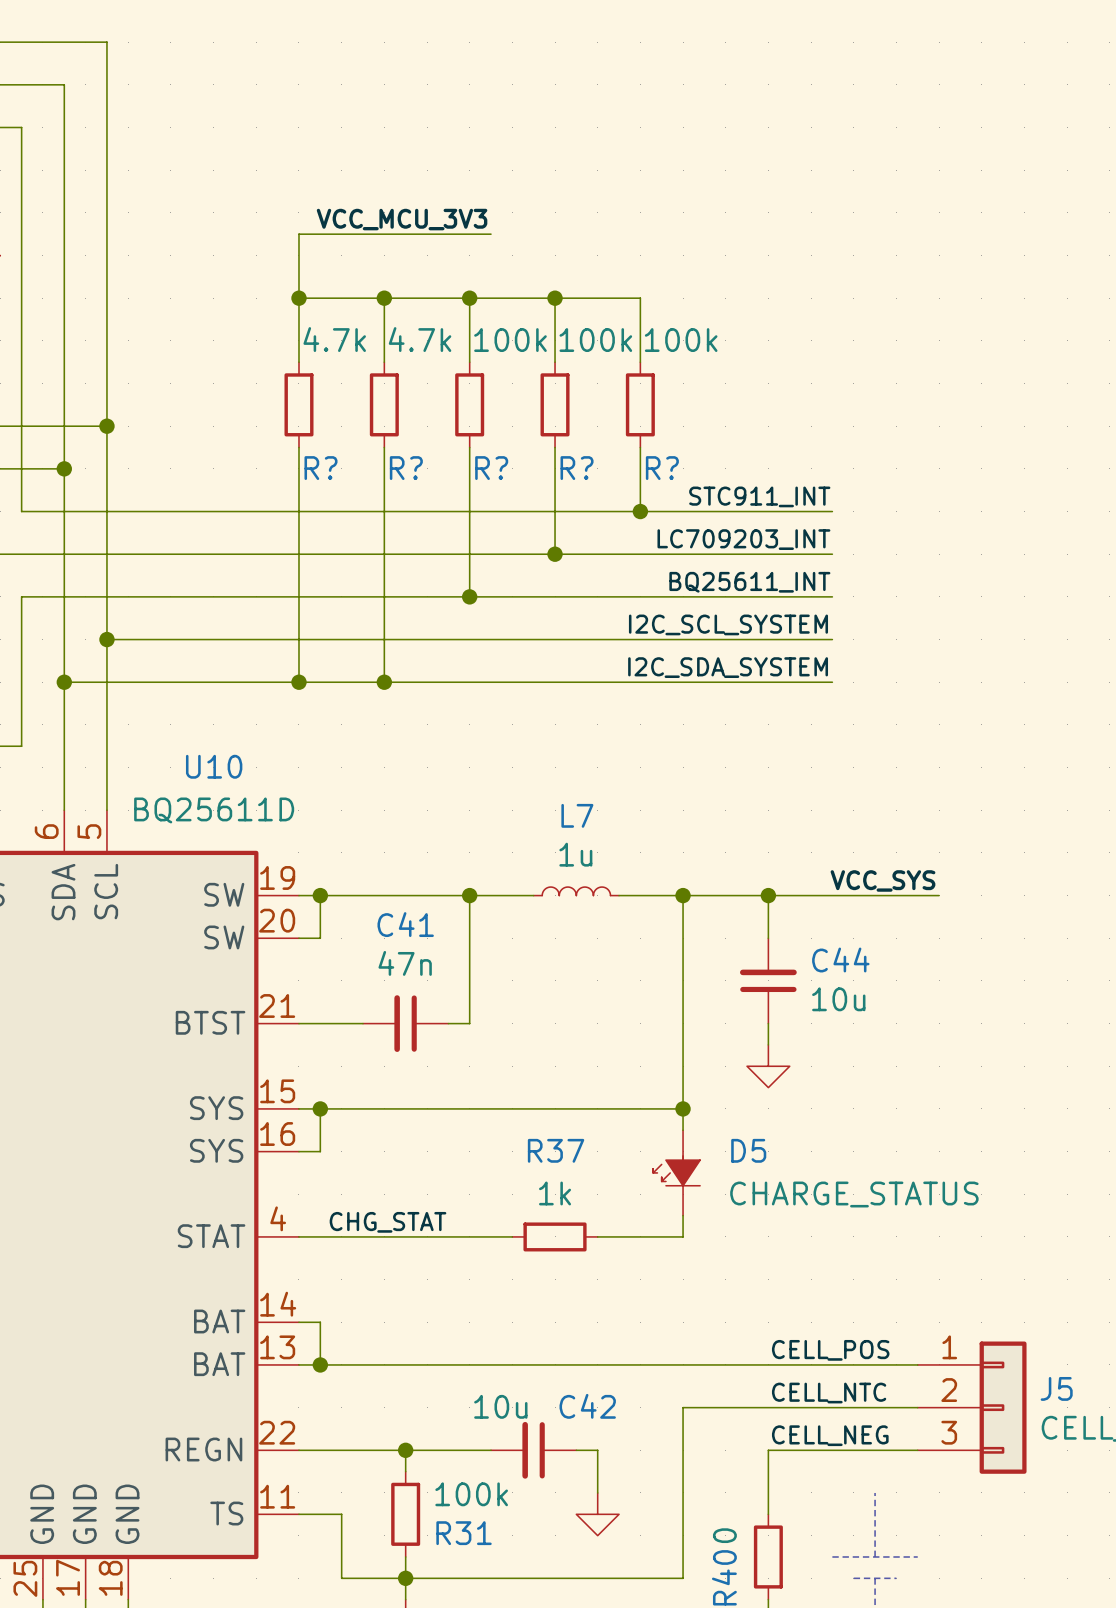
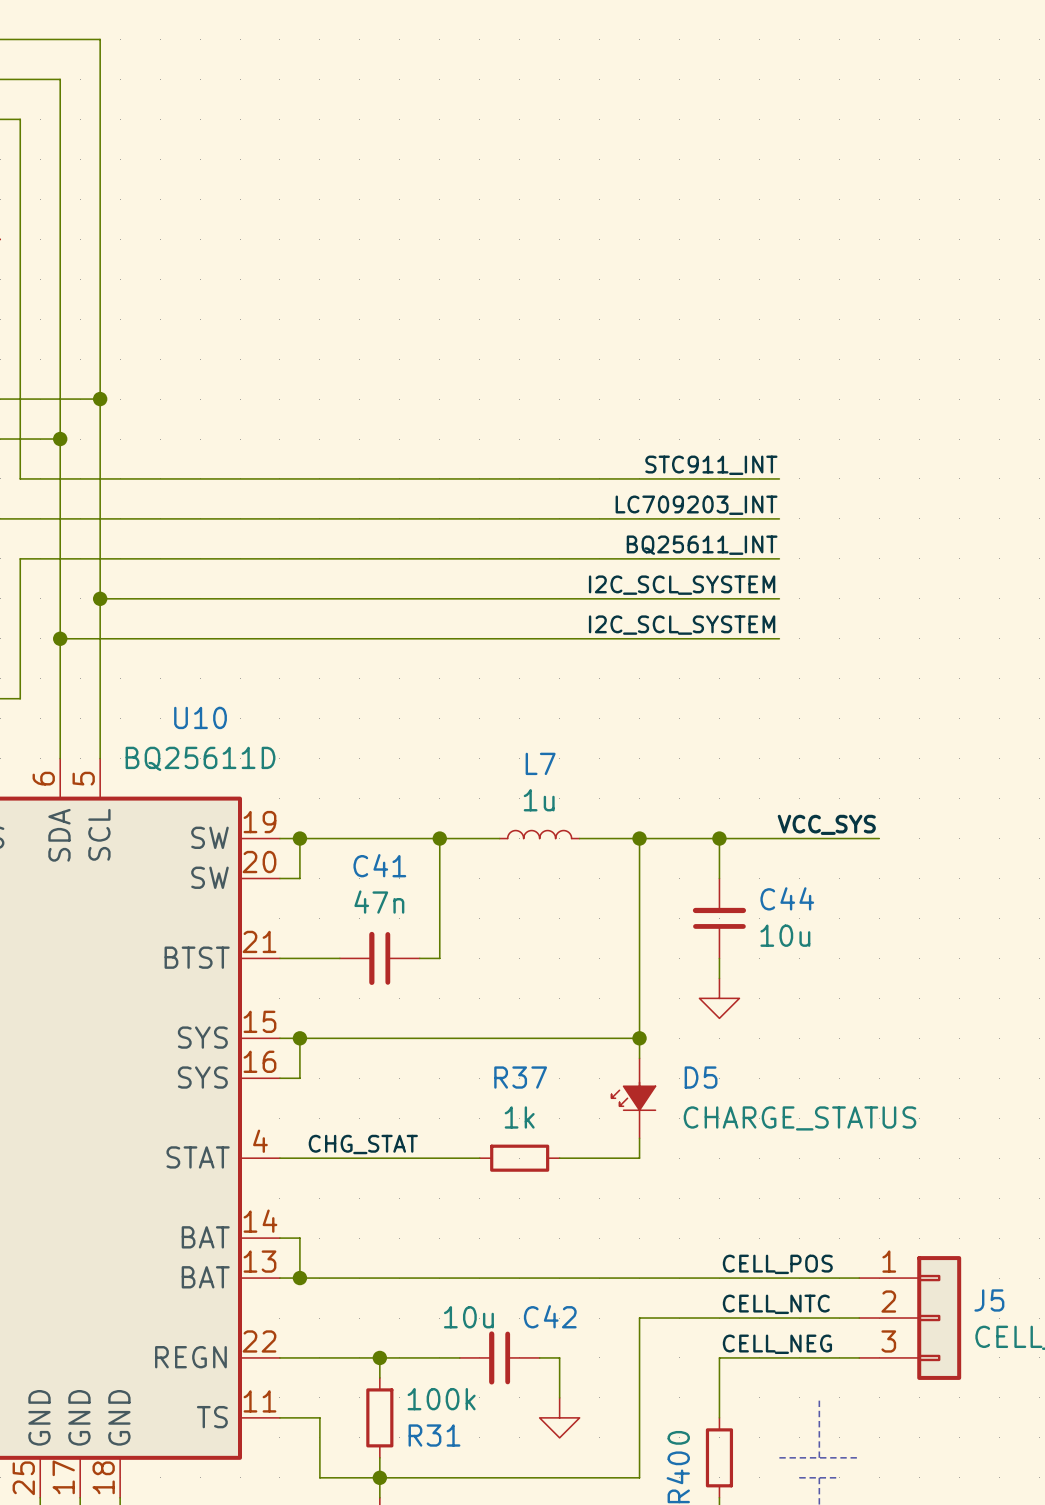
label: VCC_MCU_3V3 (402, 219) -> none
wire: (491, 234) (298, 234) (298, 362) -> none
wire: (298, 298) (640, 298) (640, 362) -> none
junction: (298, 298) -> none
wire: (384, 298) (384, 362) -> none
junction: (384, 298) -> none
wire: (469, 298) (469, 362) -> none
junction: (469, 298) -> none
wire: (555, 298) (555, 362) -> none
junction: (555, 298) -> none
R?: 4.7k (298, 404) -> none
R?: 4.7k (384, 404) -> none
R?: 100k (469, 404) -> none
R?: 100k (555, 404) -> none
R?: 100k (640, 404) -> none
wire: (298, 447) (298, 682) -> none
wire: (384, 447) (384, 682) -> none
wire: (469, 447) (469, 596) -> none
wire: (555, 447) (555, 554) -> none
wire: (640, 447) (640, 511) -> none
junction: (640, 511) -> none
junction: (555, 554) -> none
junction: (469, 596) -> none
label: I2C_SDA_SYSTEM (728, 667) -> I2C_SCL_SYSTEM (682, 625)
junction: (298, 682) -> none
junction: (384, 682) -> none

